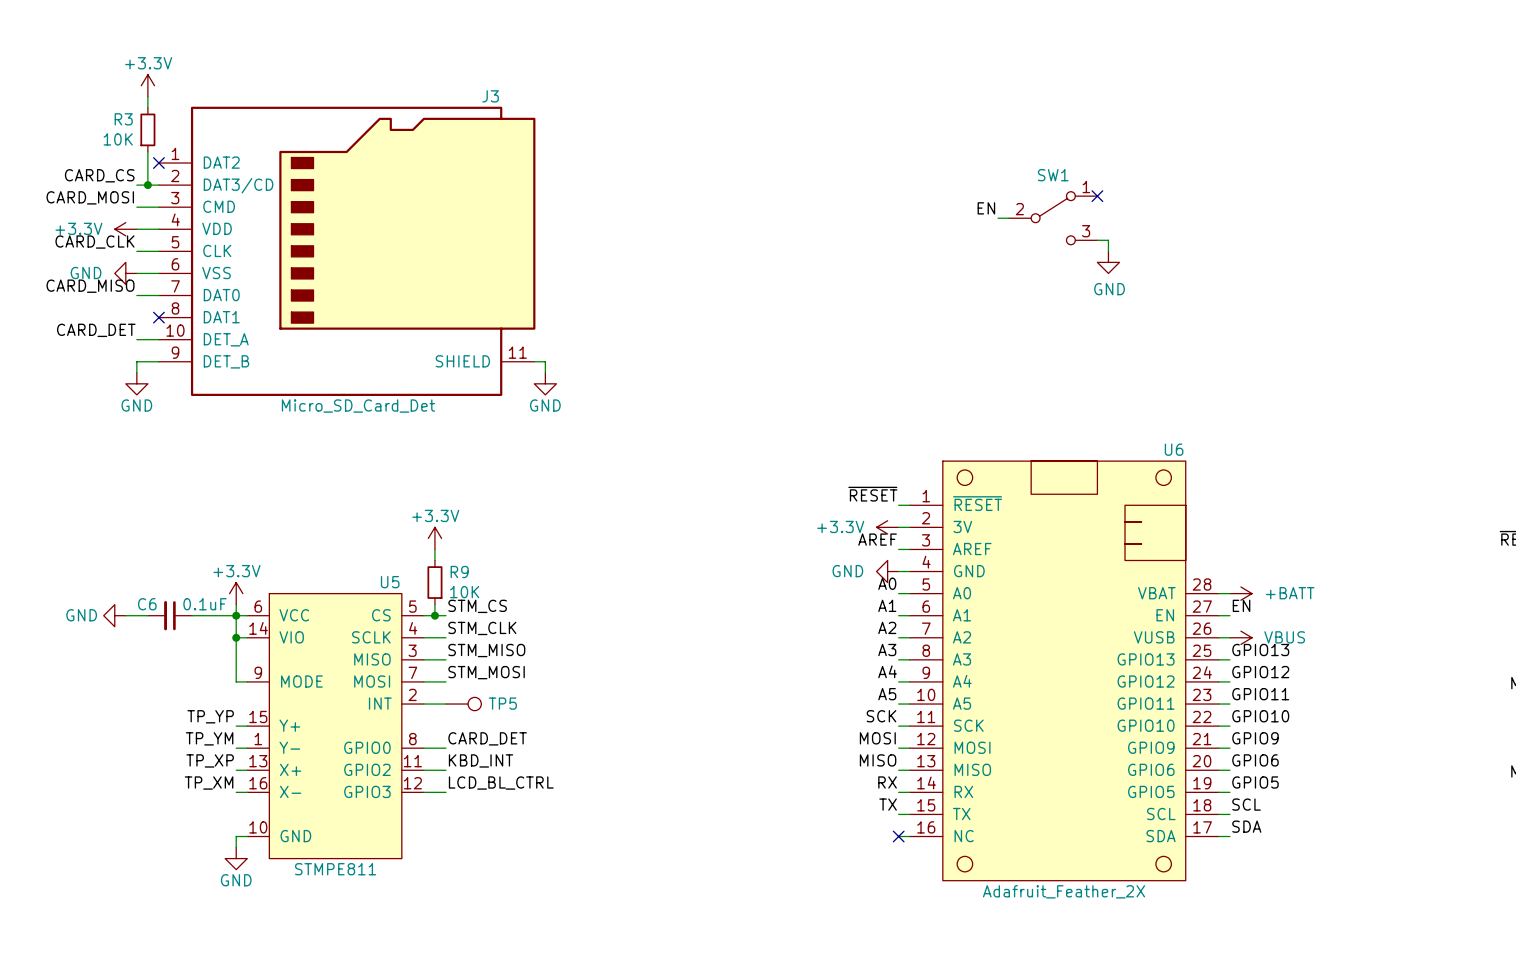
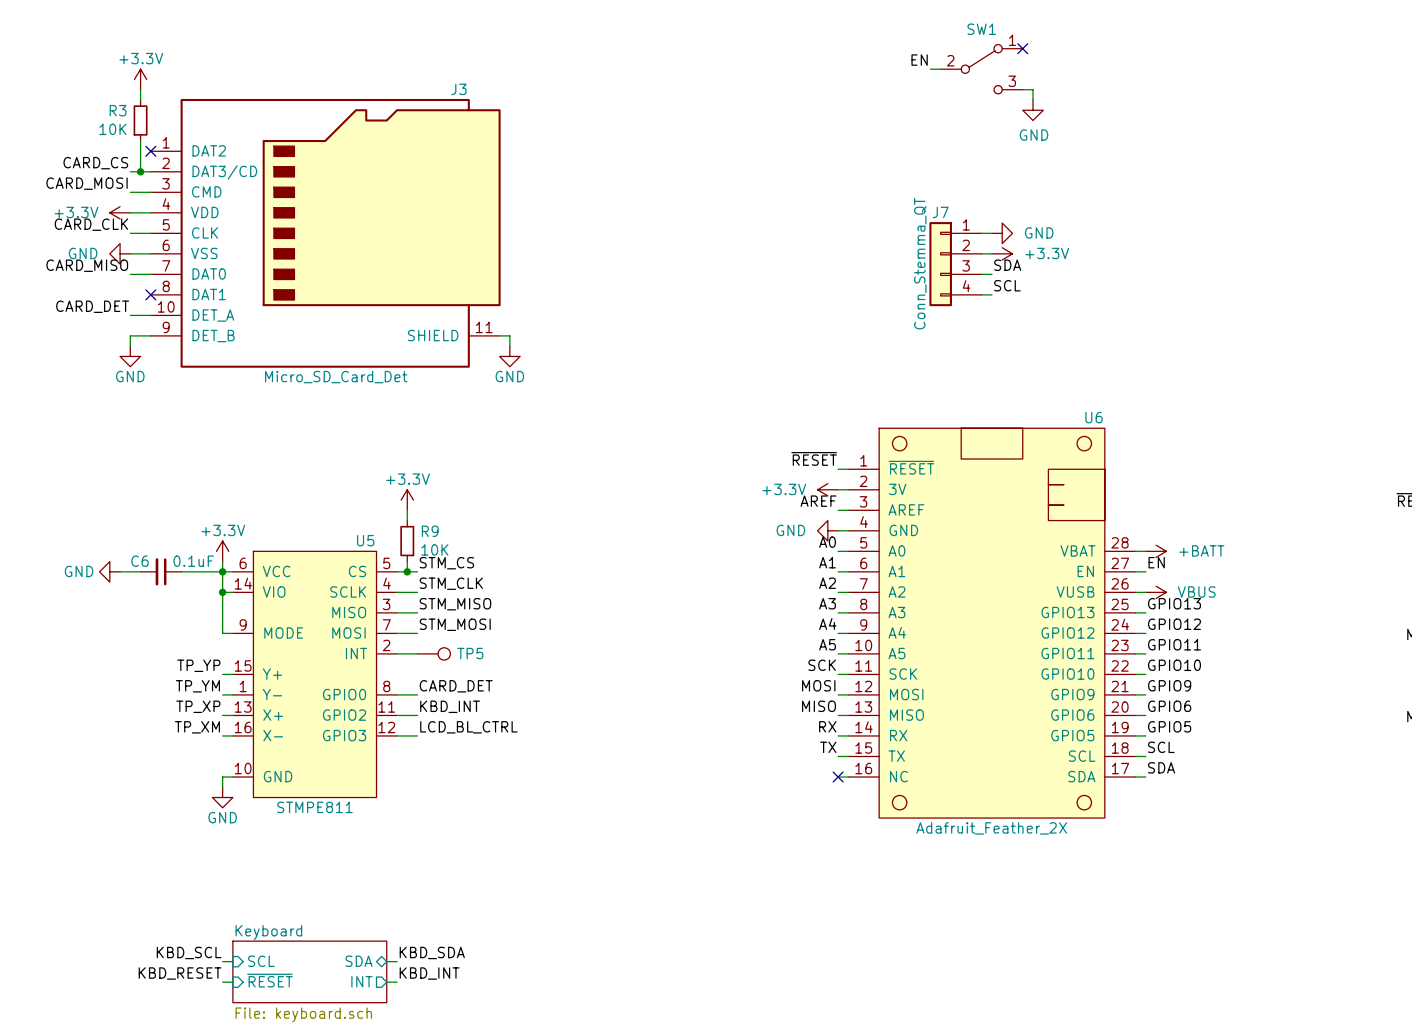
no-connect mark: none -> (1022, 48)
power symbol: none -> GND (1033, 110)
no-connect mark: (1097, 196) -> none
label position: EN (986, 208) -> EN (919, 60)
wire: (998, 218) (1009, 218) -> (930, 69) (940, 69)
SW1 position: (1053, 218) -> (981, 69)
wire: (1097, 240) (1108, 240) (1108, 251) -> (1022, 89) (1033, 89) (1033, 99)
wire: none -> (981, 233) (991, 233)
power symbol rotation: 0° (1108, 262) -> 90° counterclockwise (1002, 233)
power symbol position: GND (1108, 262) -> GND (1002, 233)
wire: none -> (981, 253) (991, 253)
power symbol: none -> +3.3V (1002, 253)
J7: none -> Conn_Stemma_QT (955, 264)
label: none -> SDA (1007, 265)
wire: none -> (981, 274) (991, 274)
label: none -> SCL (1007, 285)
wire: none -> (981, 294) (991, 294)

